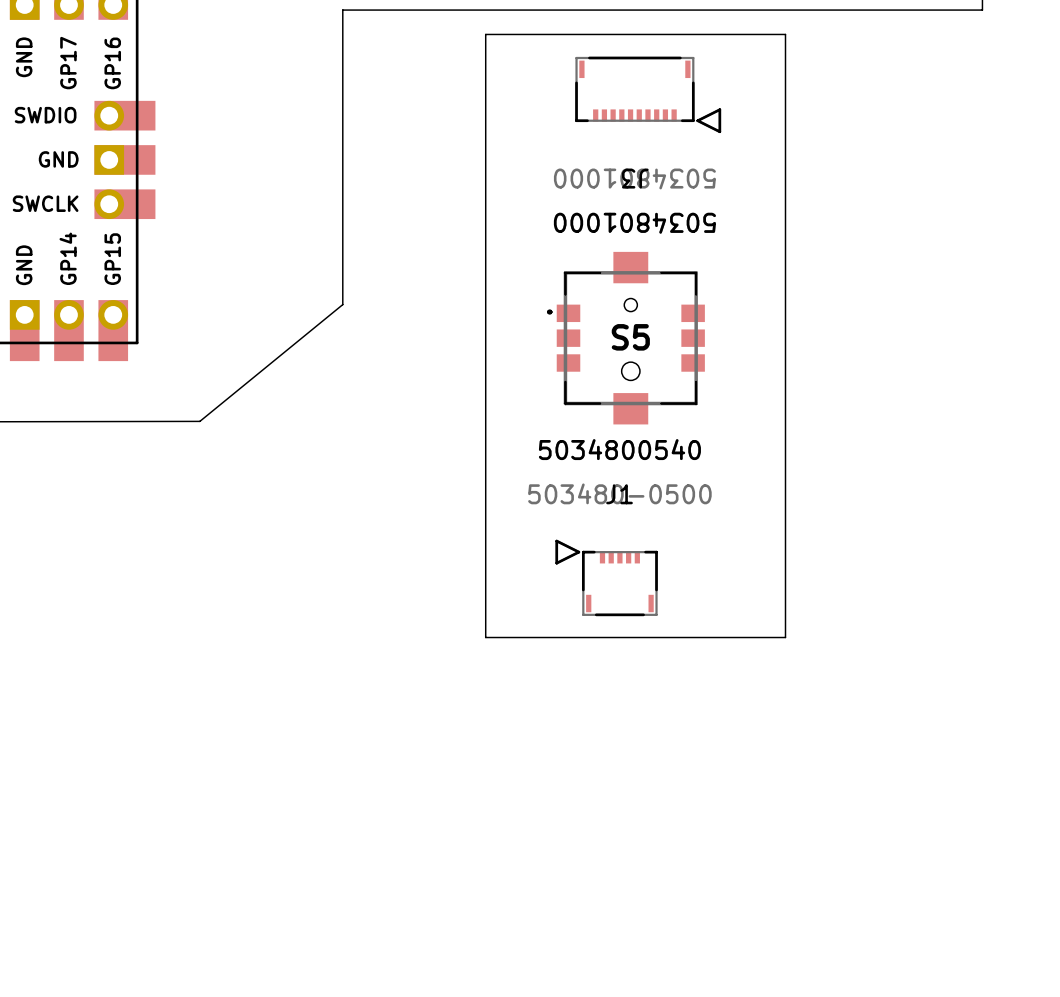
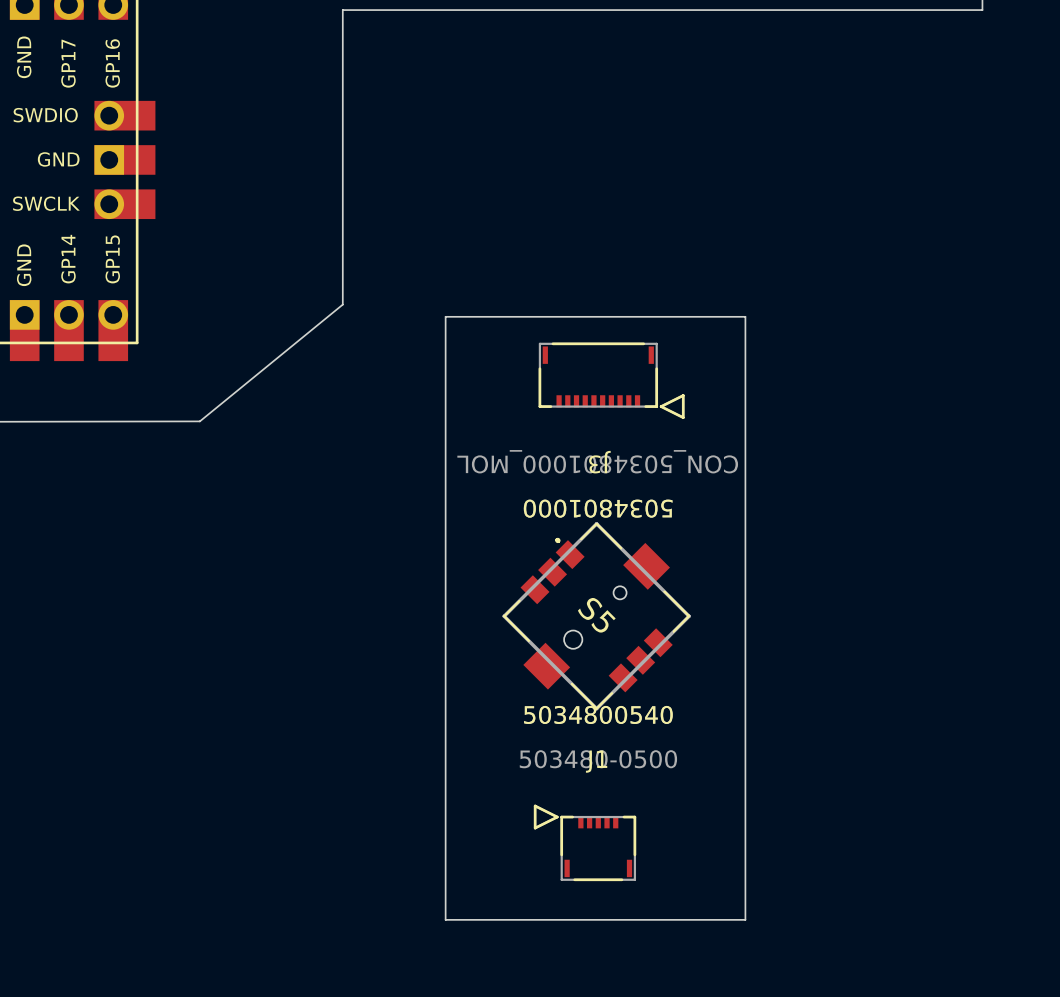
board edge: (485, 34) (785, 34) (785, 637) (485, 637) (485, 34) -> (445, 316) (745, 316) (745, 919) (445, 919) (445, 316)
J3 position: (648, 94) -> (611, 380)
J3 value: 5034801000 (634, 178) -> CON_5034801000_MOL (597, 461)
S5 rotation: 0° (626, 338) -> 45° clockwise (596, 616)
S5 position: (626, 338) -> (596, 616)
J1 position: (606, 577) -> (585, 842)

